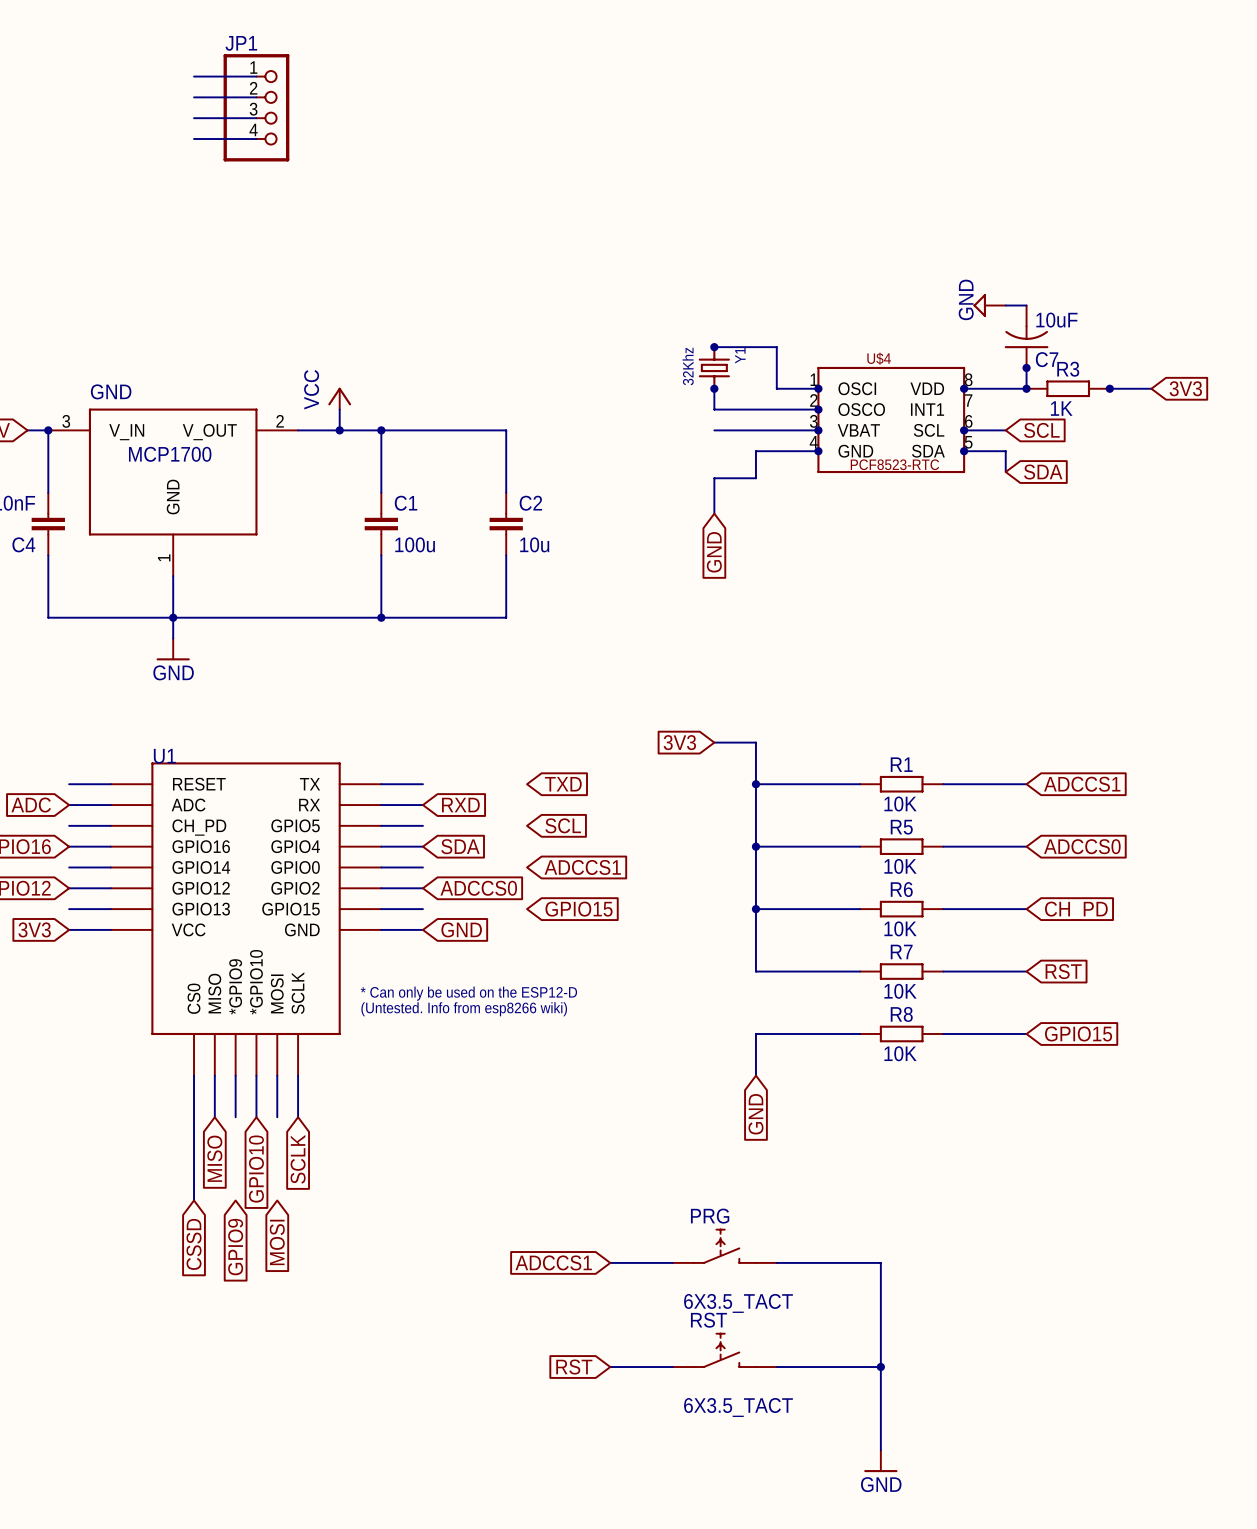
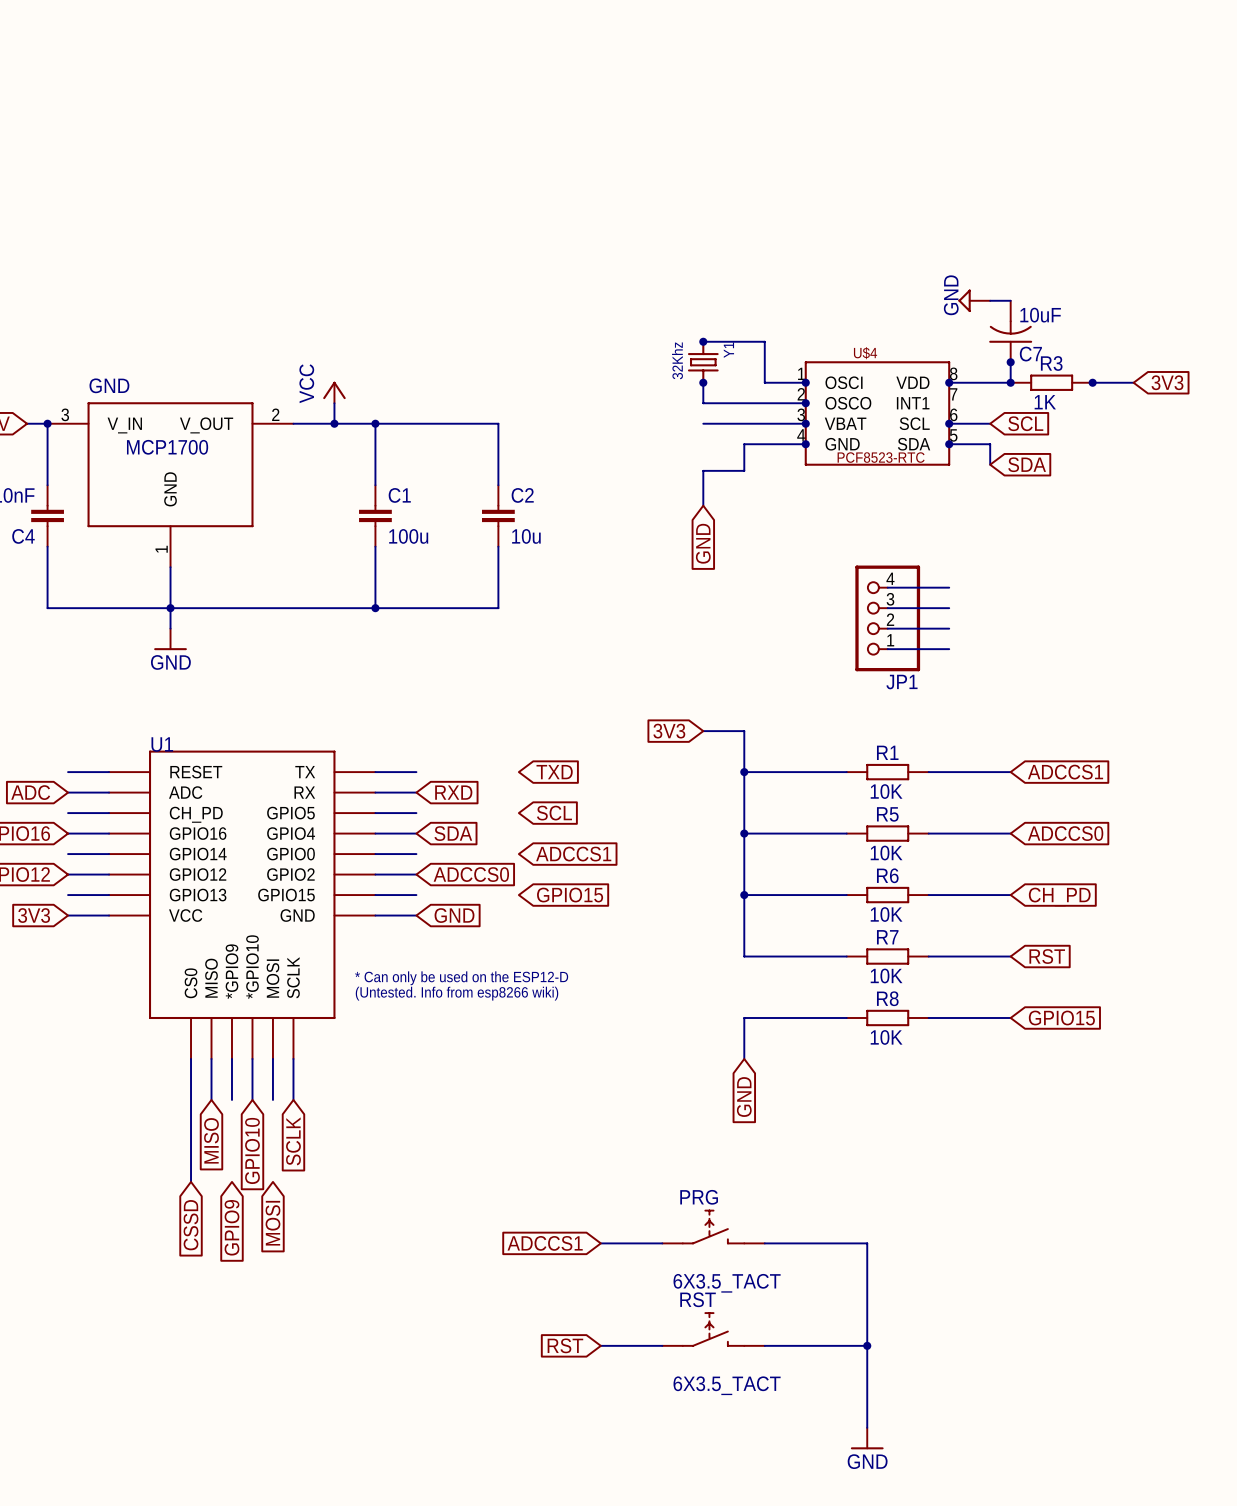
wire: (194, 76) (256, 76) -> none
wire: (194, 97) (256, 97) -> none
JP1 rotation: 0° (256, 107) -> 180° (887, 618)
JP1 position: (256, 107) -> (887, 618)
wire: (194, 118) (256, 118) -> none
wire: (194, 139) (256, 139) -> none
wire: none -> (887, 587) (949, 587)
wire: none -> (887, 608) (949, 608)
wire: none -> (887, 628) (949, 628)
wire: none -> (887, 649) (949, 649)

